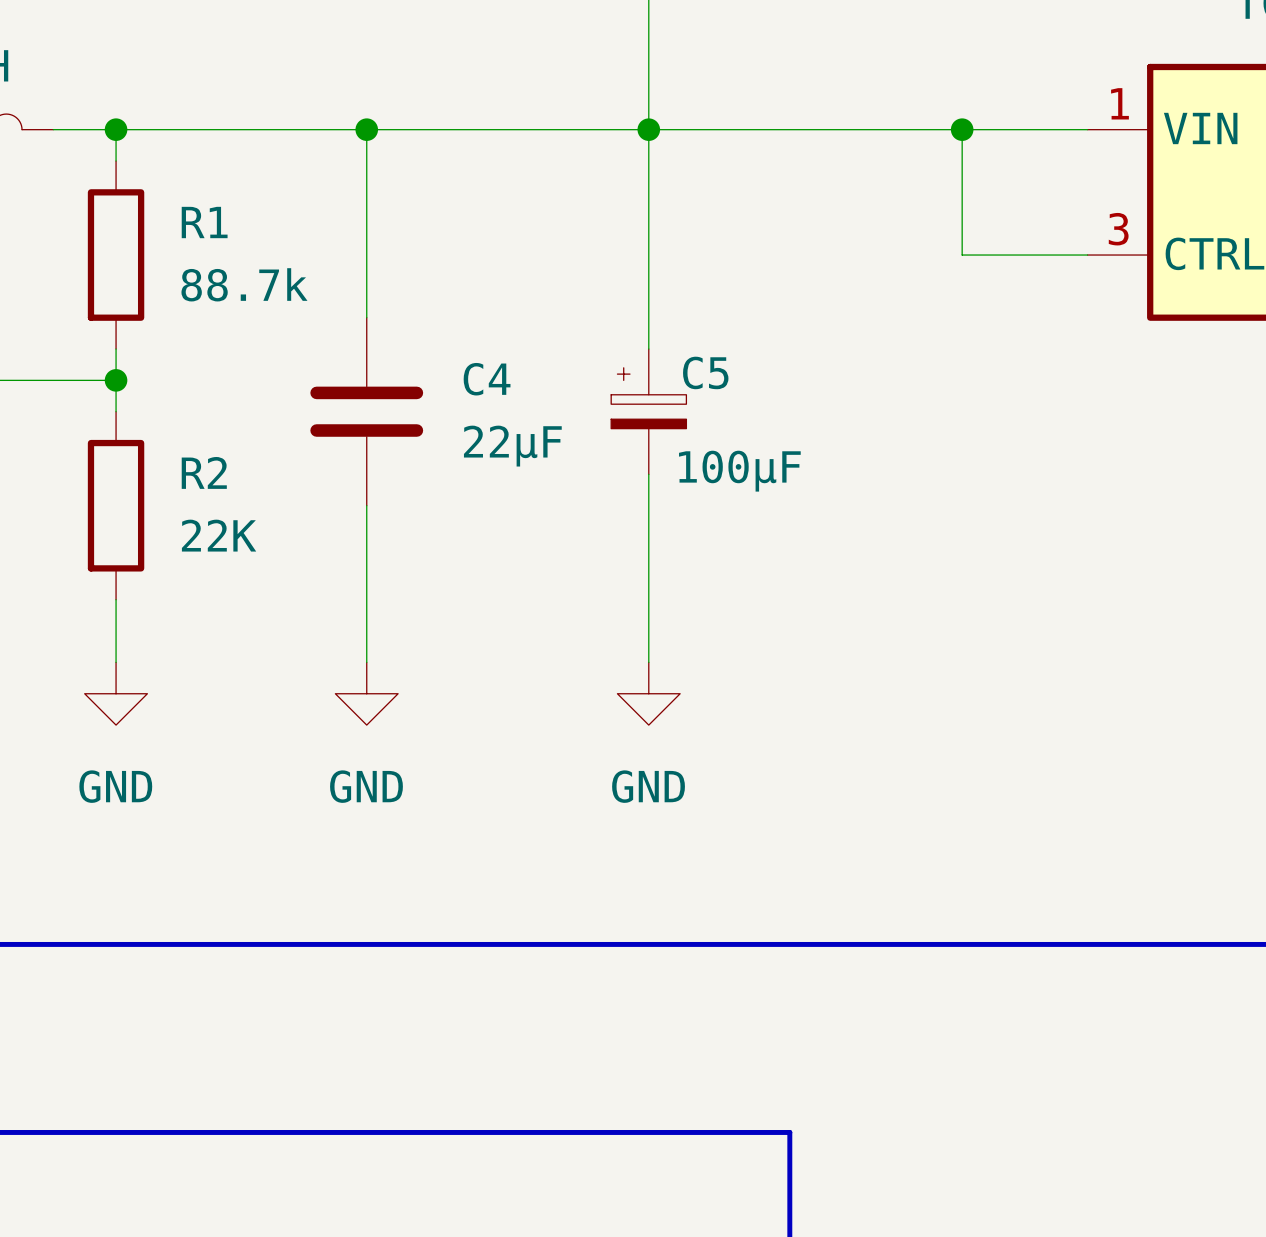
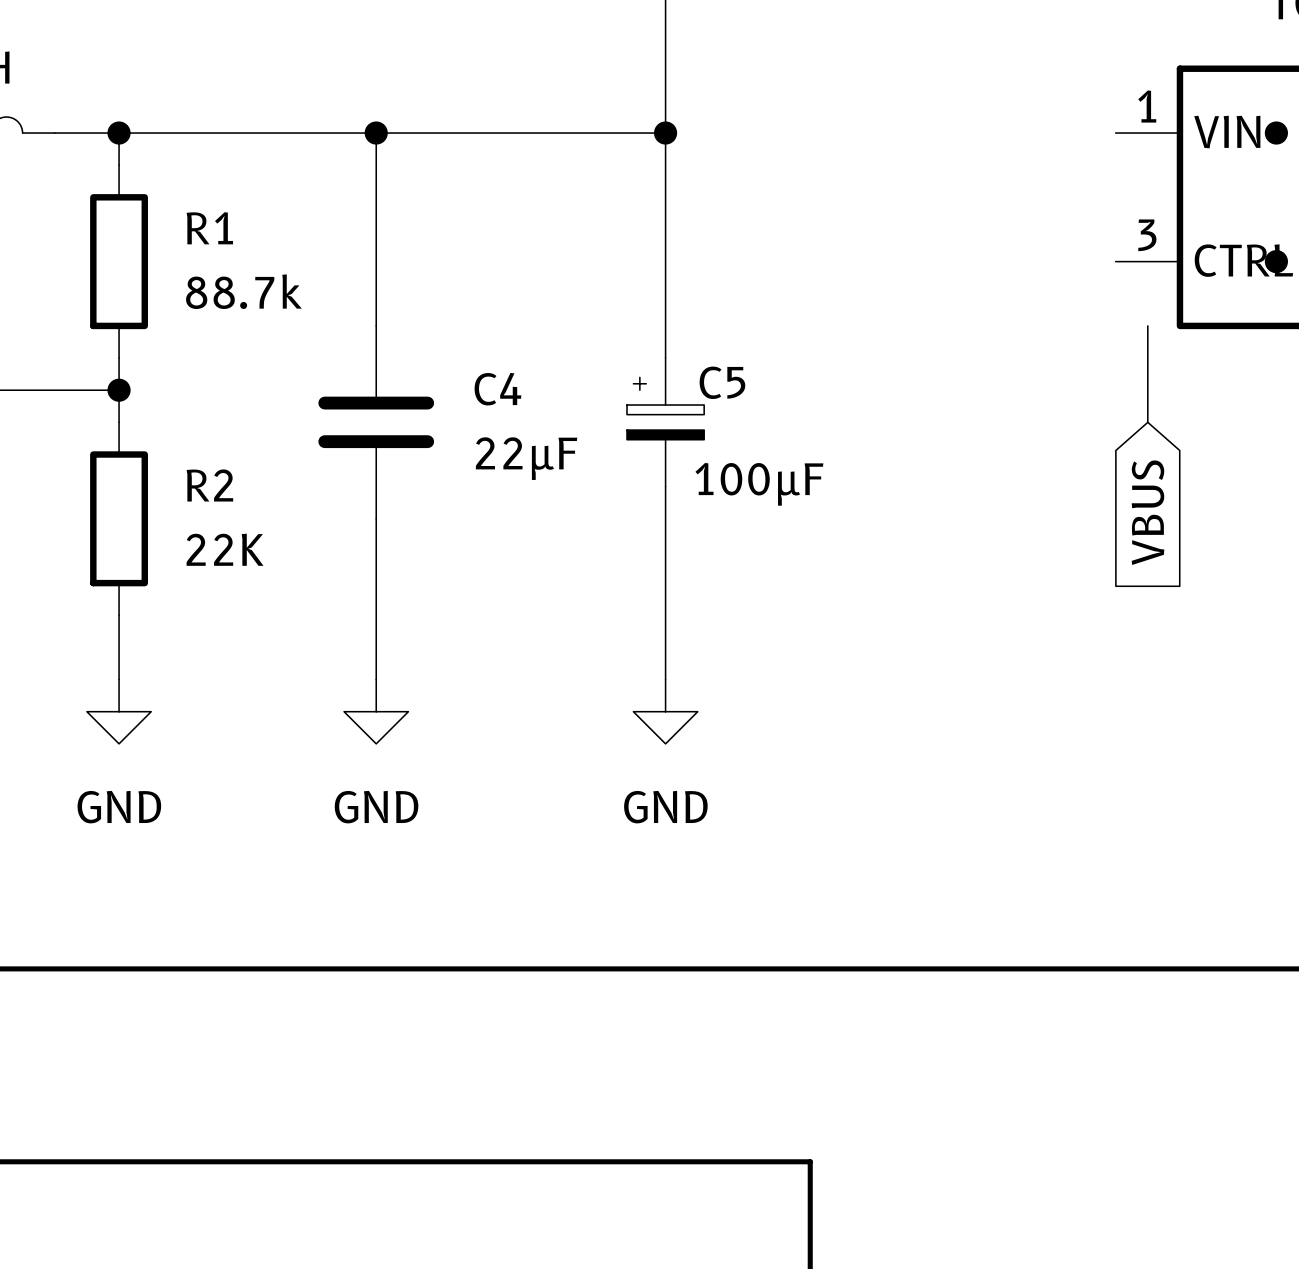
wire: (648, 129) (1087, 129) -> none
wire: (962, 129) (962, 255) (1087, 255) -> none
junction: (962, 129) -> none
junction: none -> (1276, 133)
junction: none -> (1276, 261)
wire: none -> (1147, 325) (1147, 422)
global label: none -> VBUS (1148, 512)

